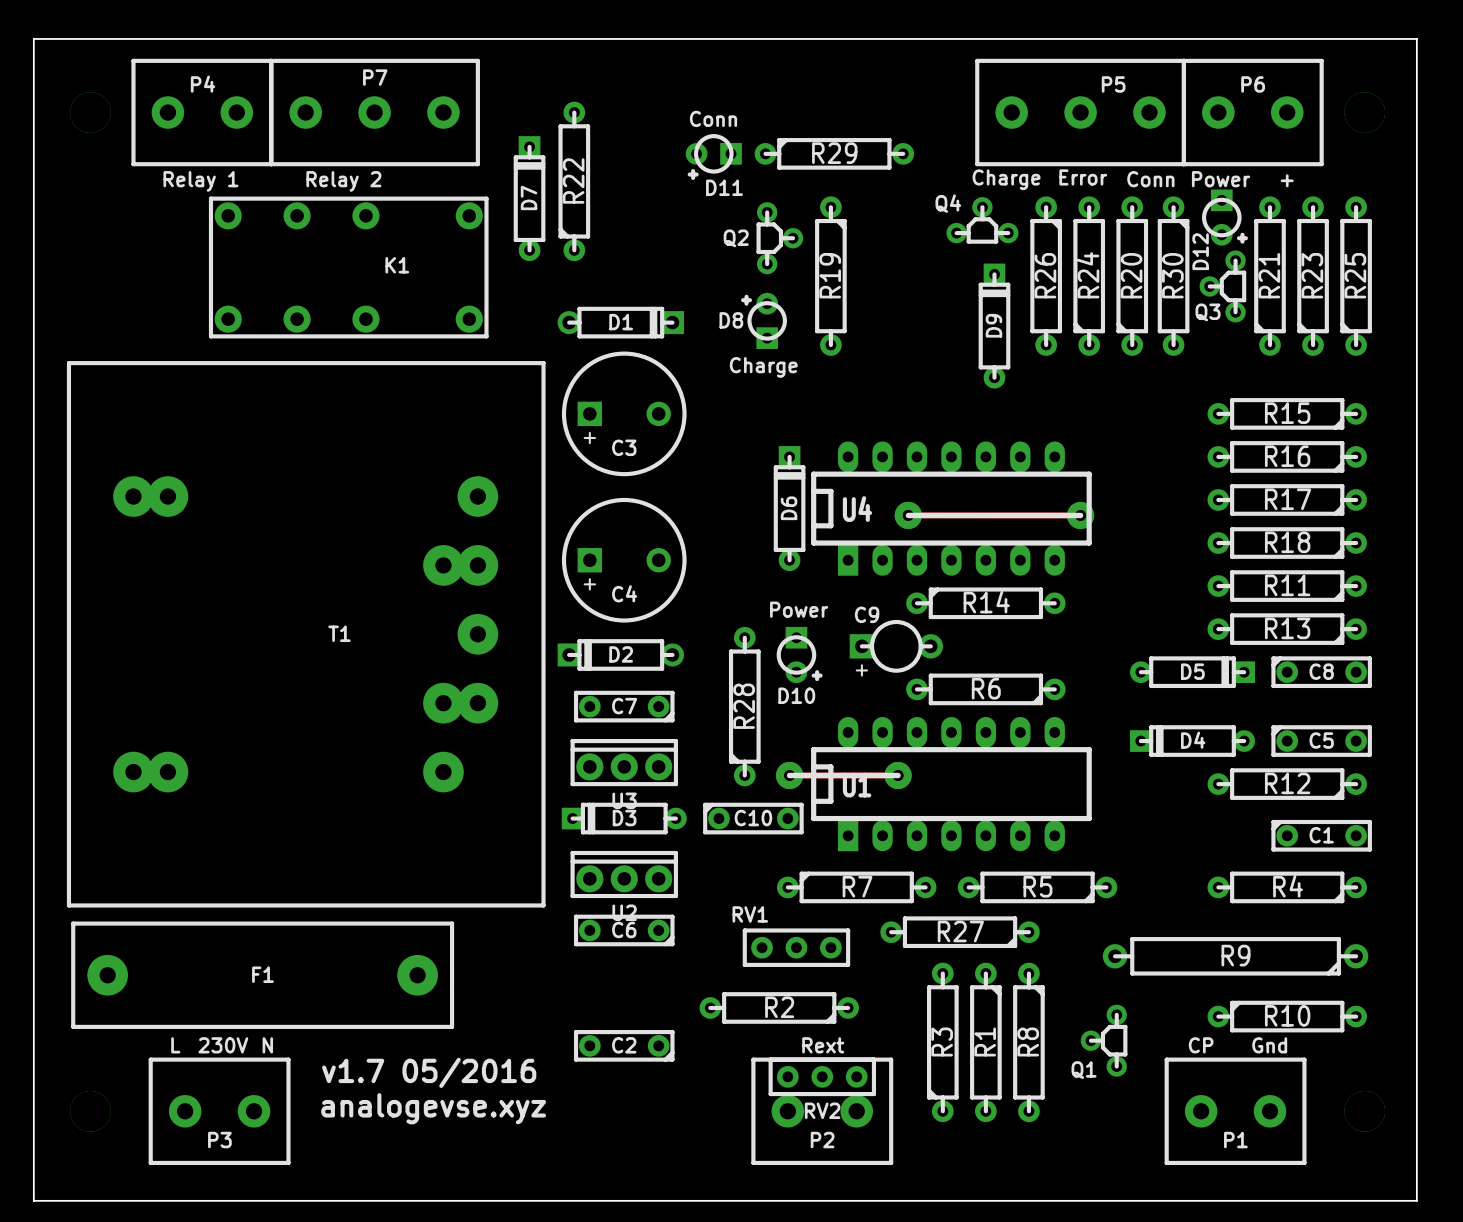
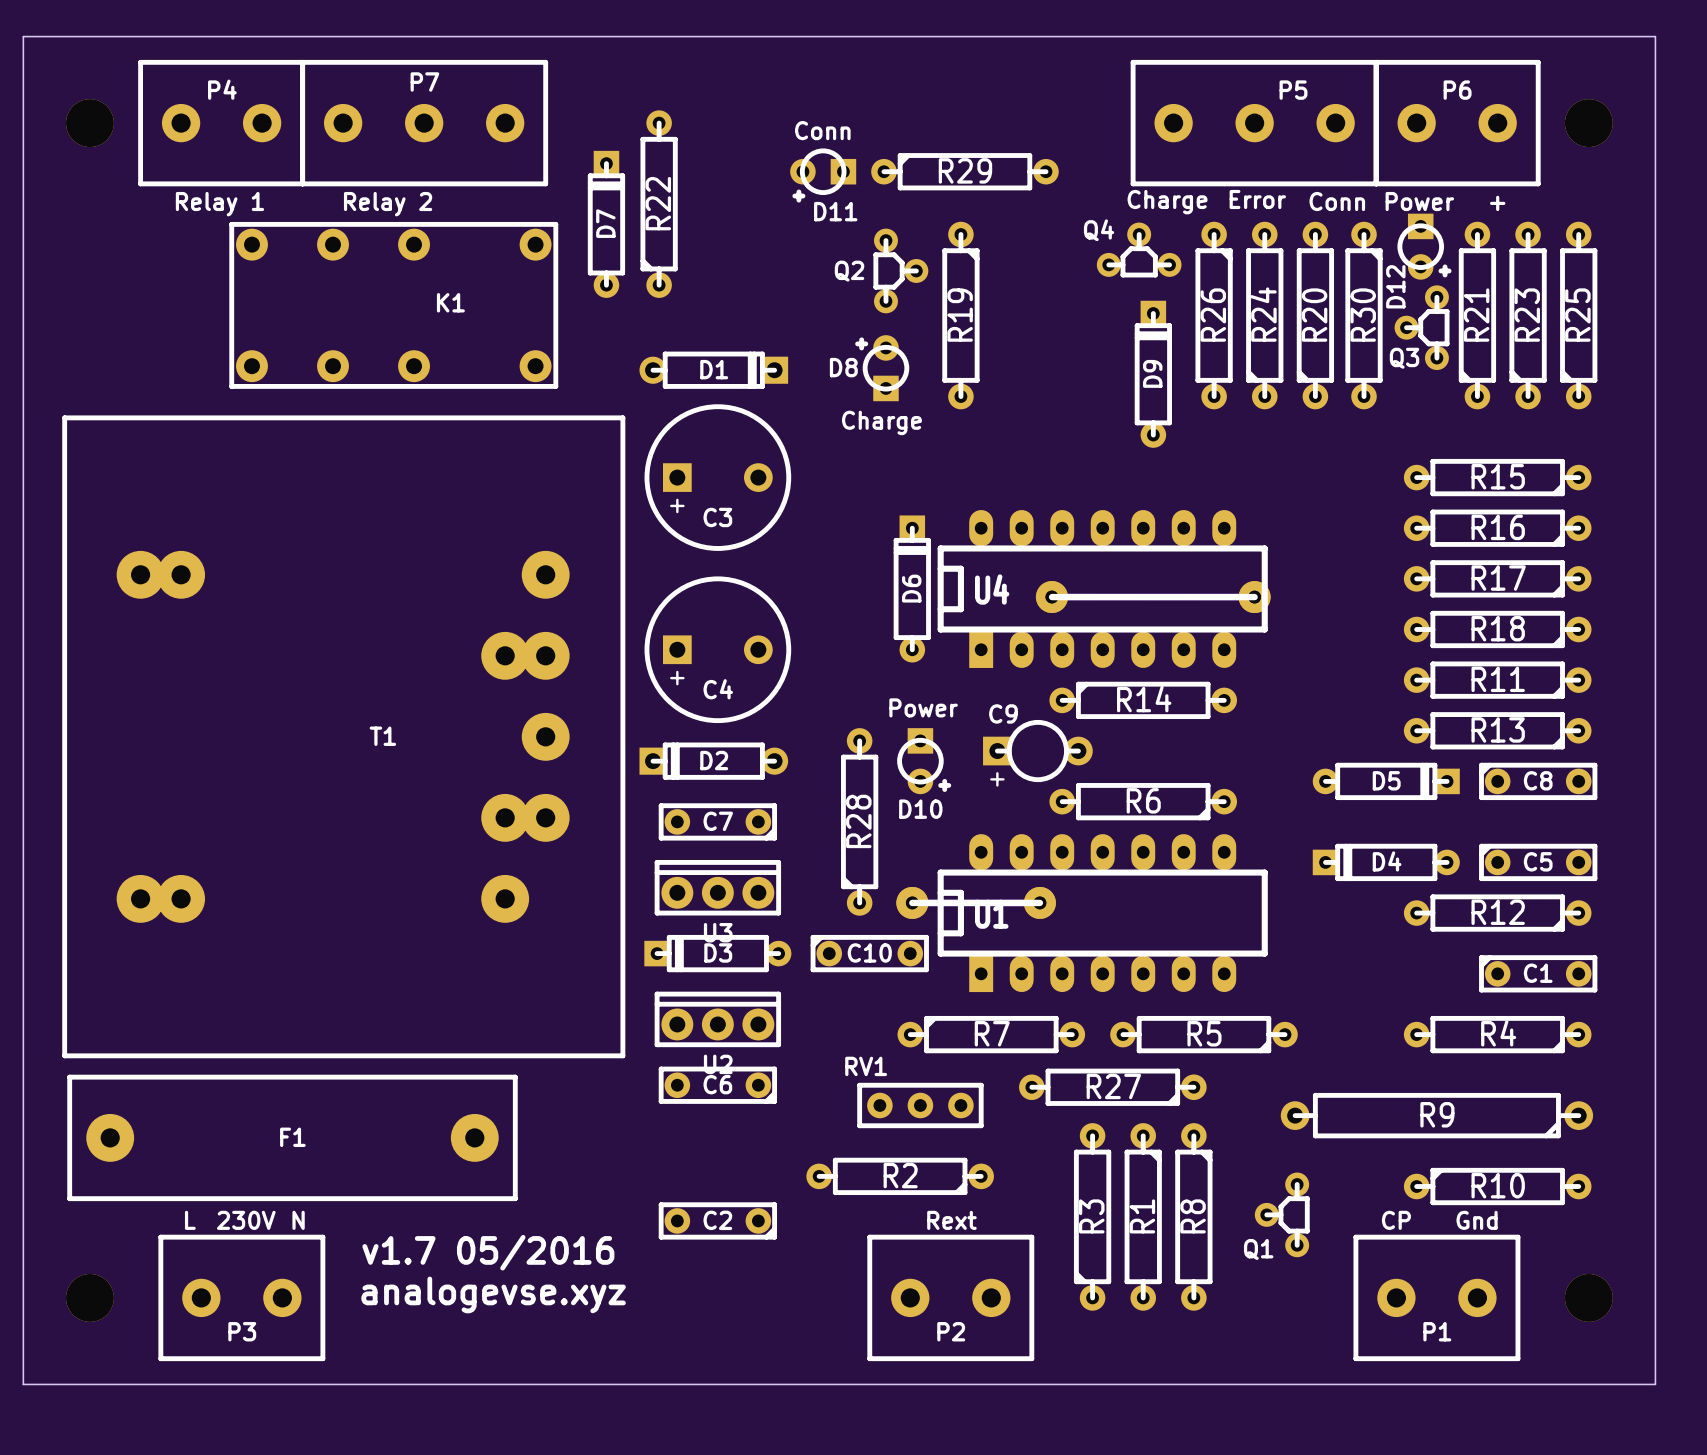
board edge: (1416, 38) (1416, 1200) (33, 1200) (33, 1184) -> (1650, 36) (1655, 36) (1655, 1384) (23, 1384)
RV2: (822, 1076) -> none

